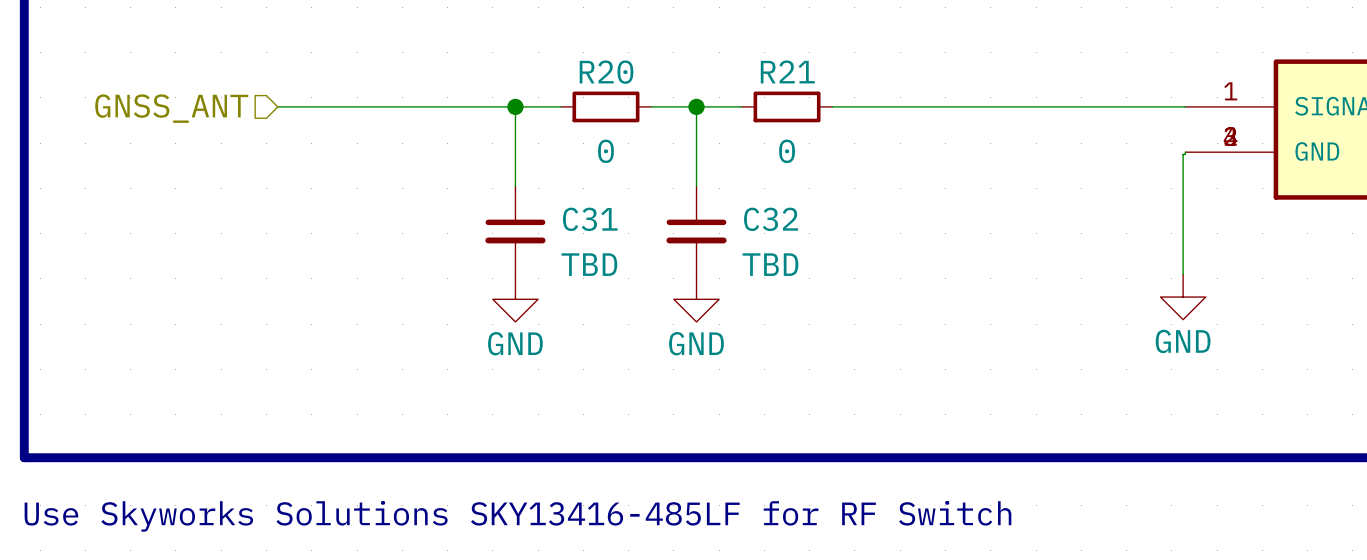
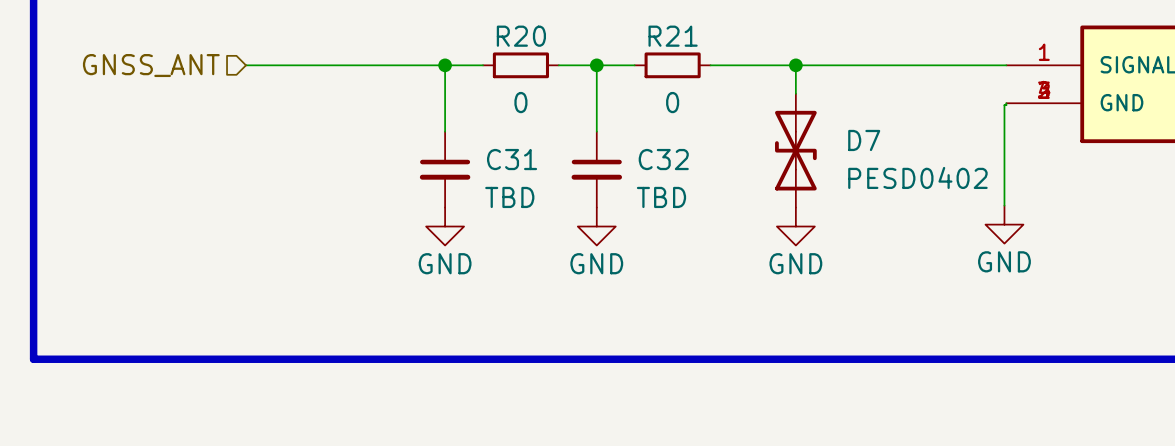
wire: none -> (795, 65) (795, 93)
junction: none -> (795, 65)
D7: none -> PESD0402 (795, 150)
power symbol: none -> GND (795, 226)
text: Use Skyworks Solutions SKY13416-485LF for RF Switch (517, 516) -> none

